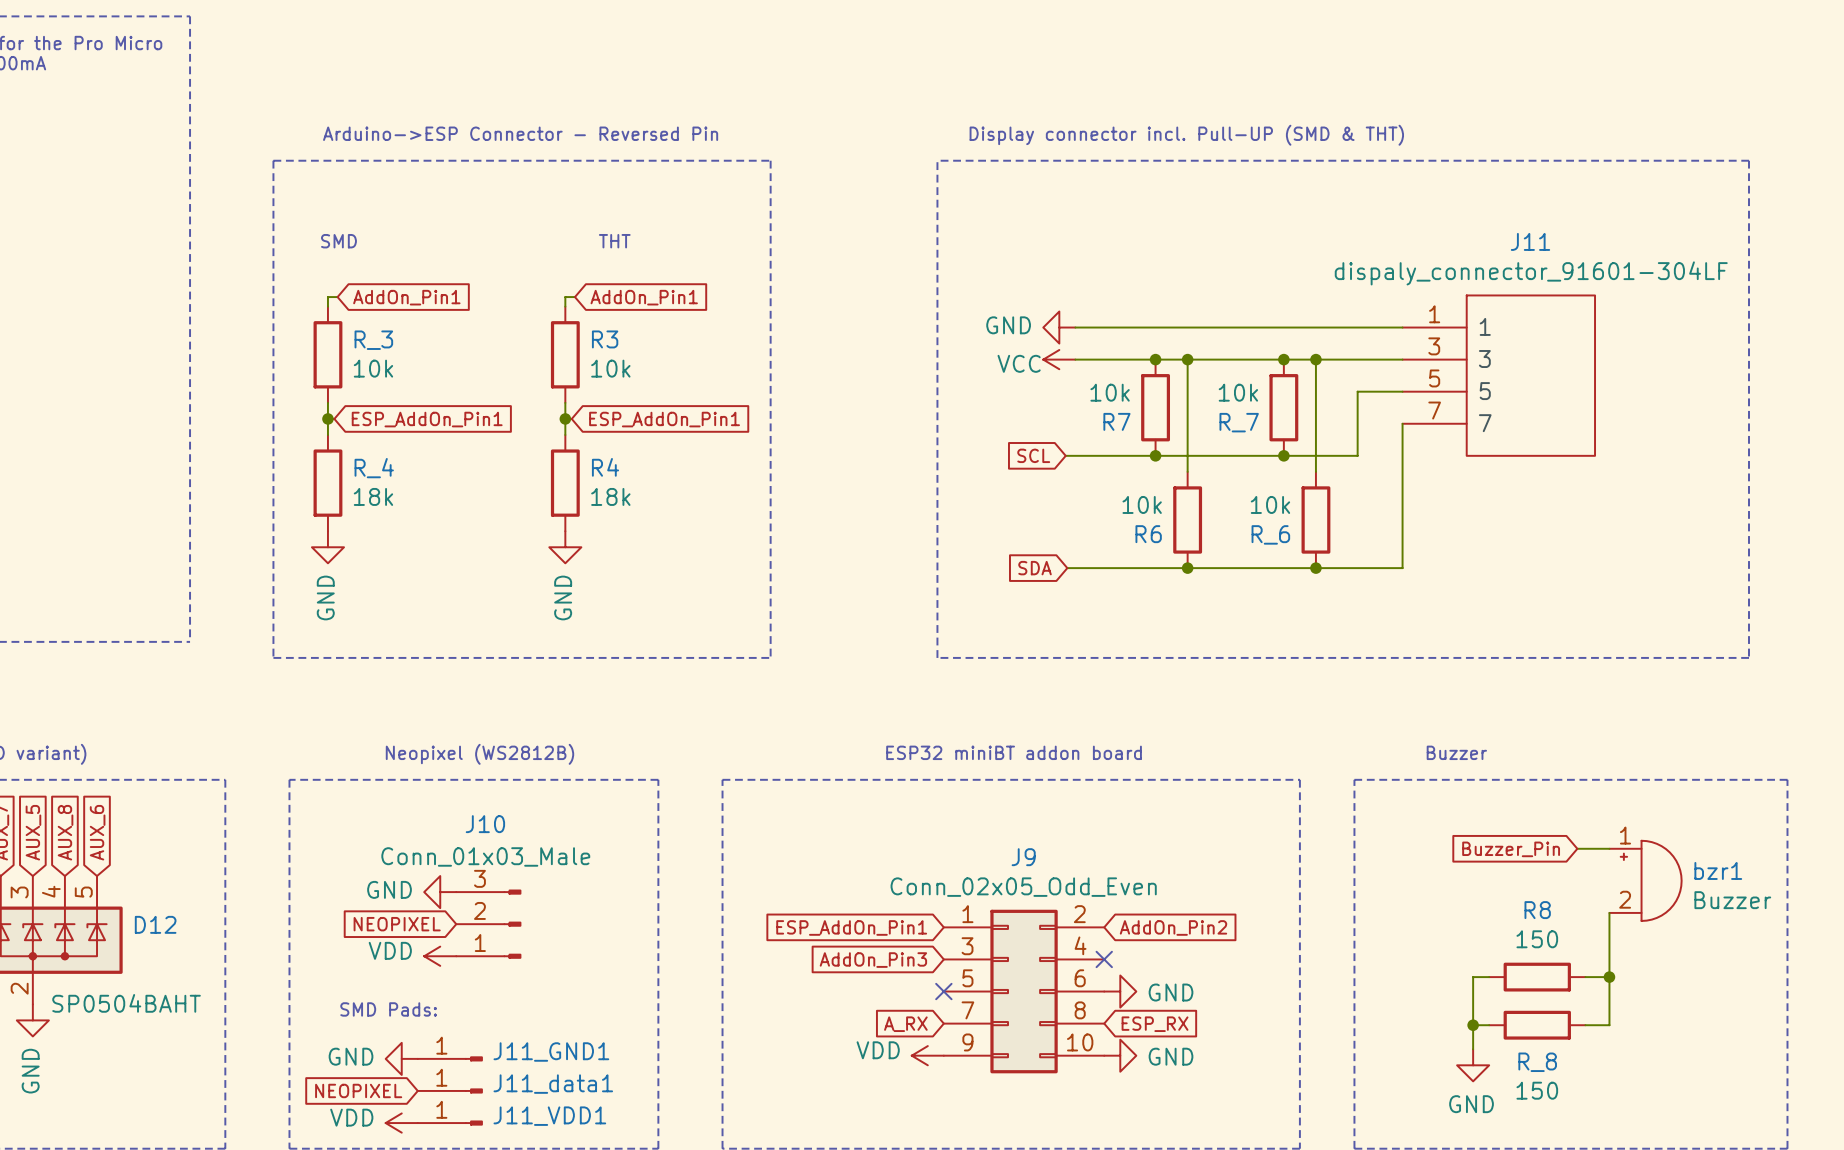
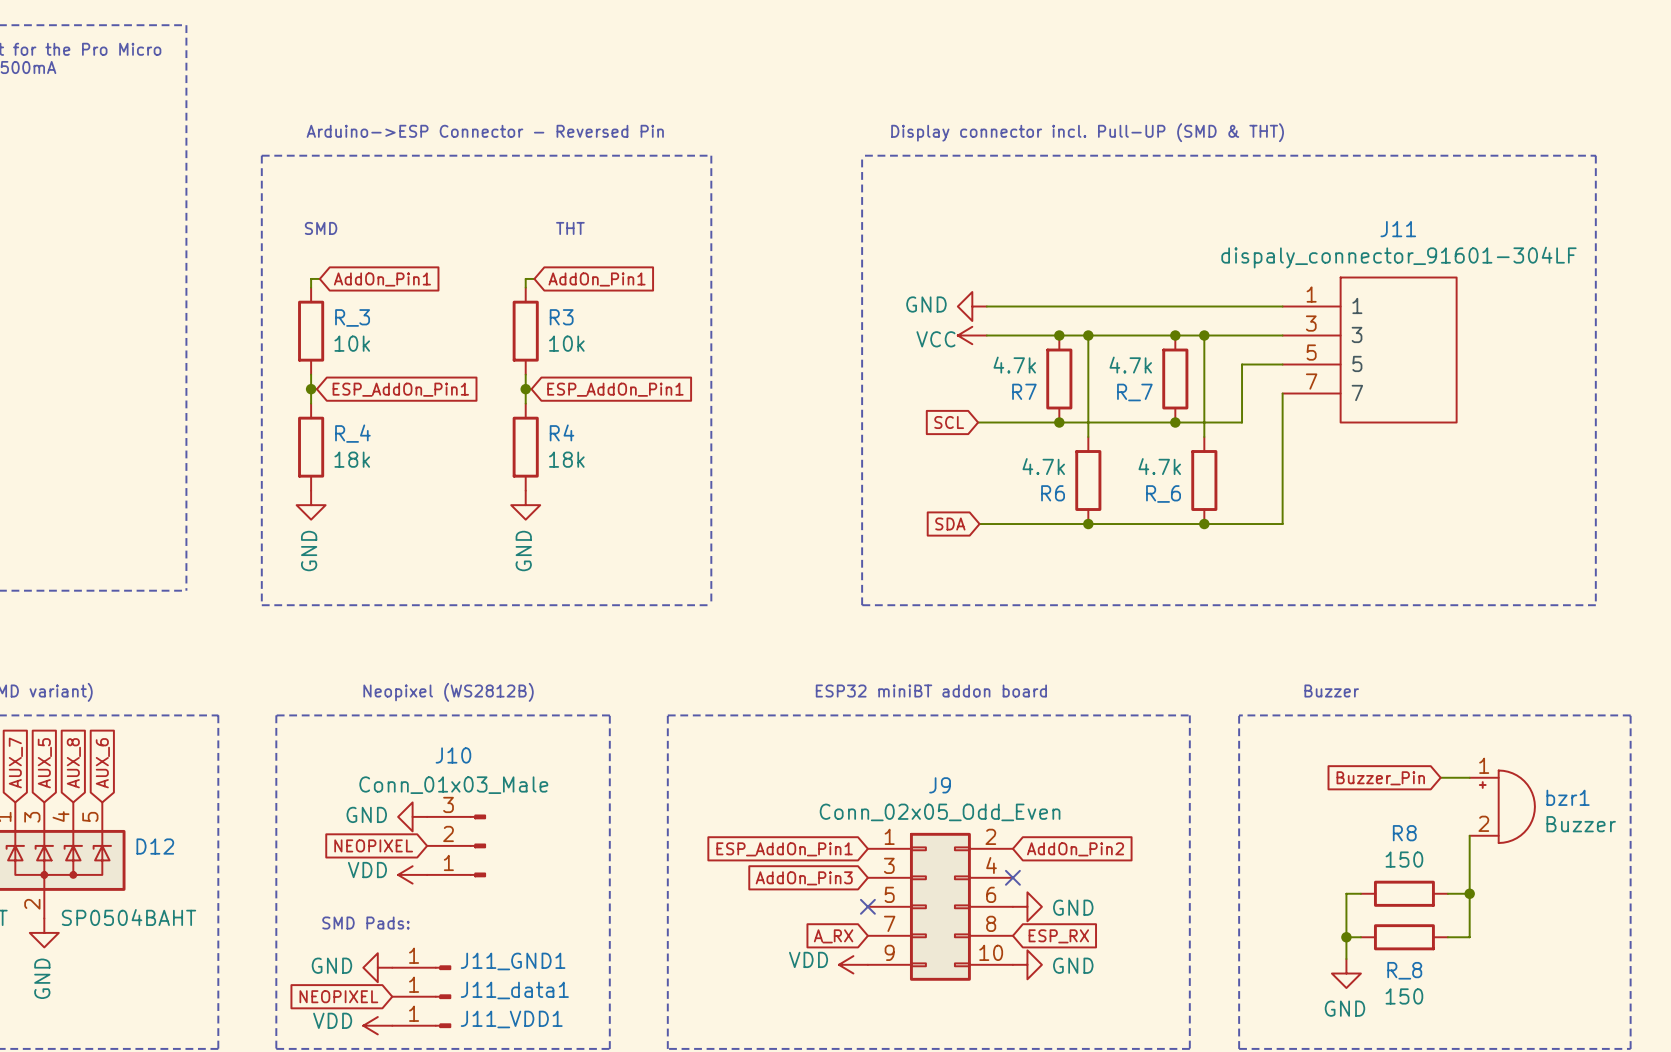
R7 value: 10k (1110, 392) -> 4.7k (1014, 365)
R_7 value: 10k (1238, 392) -> 4.7k (1130, 365)
R6 value: 10k (1142, 504) -> 4.7k (1043, 466)
R_6 value: 10k (1270, 504) -> 4.7k (1159, 466)

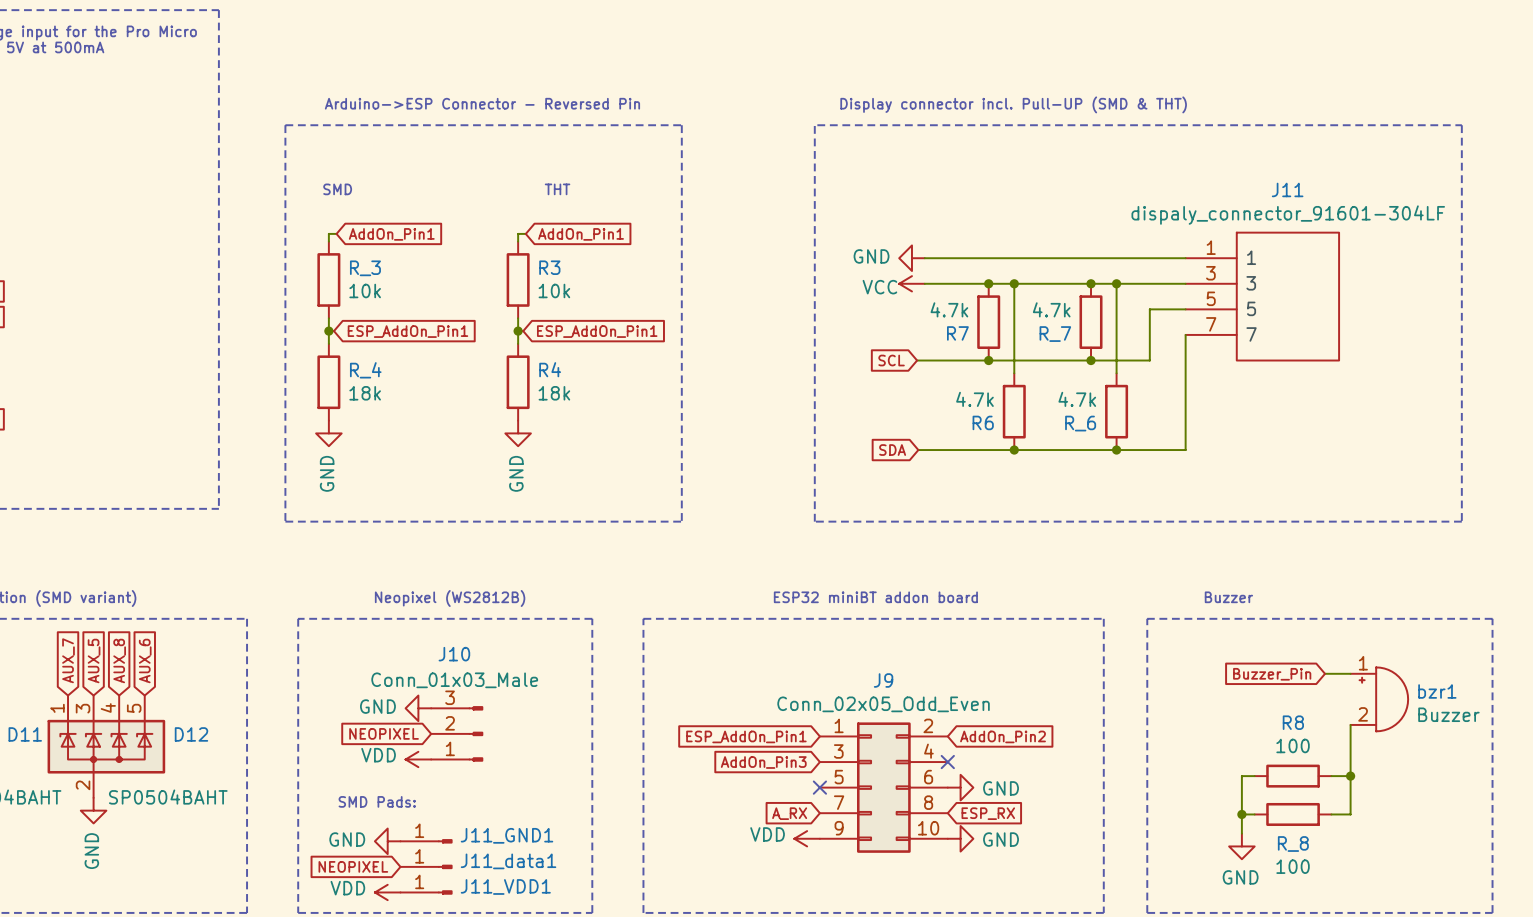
R8 value: 150 (1404, 859) -> 100 (1293, 745)
R_8 value: 150 (1404, 996) -> 100 (1293, 866)

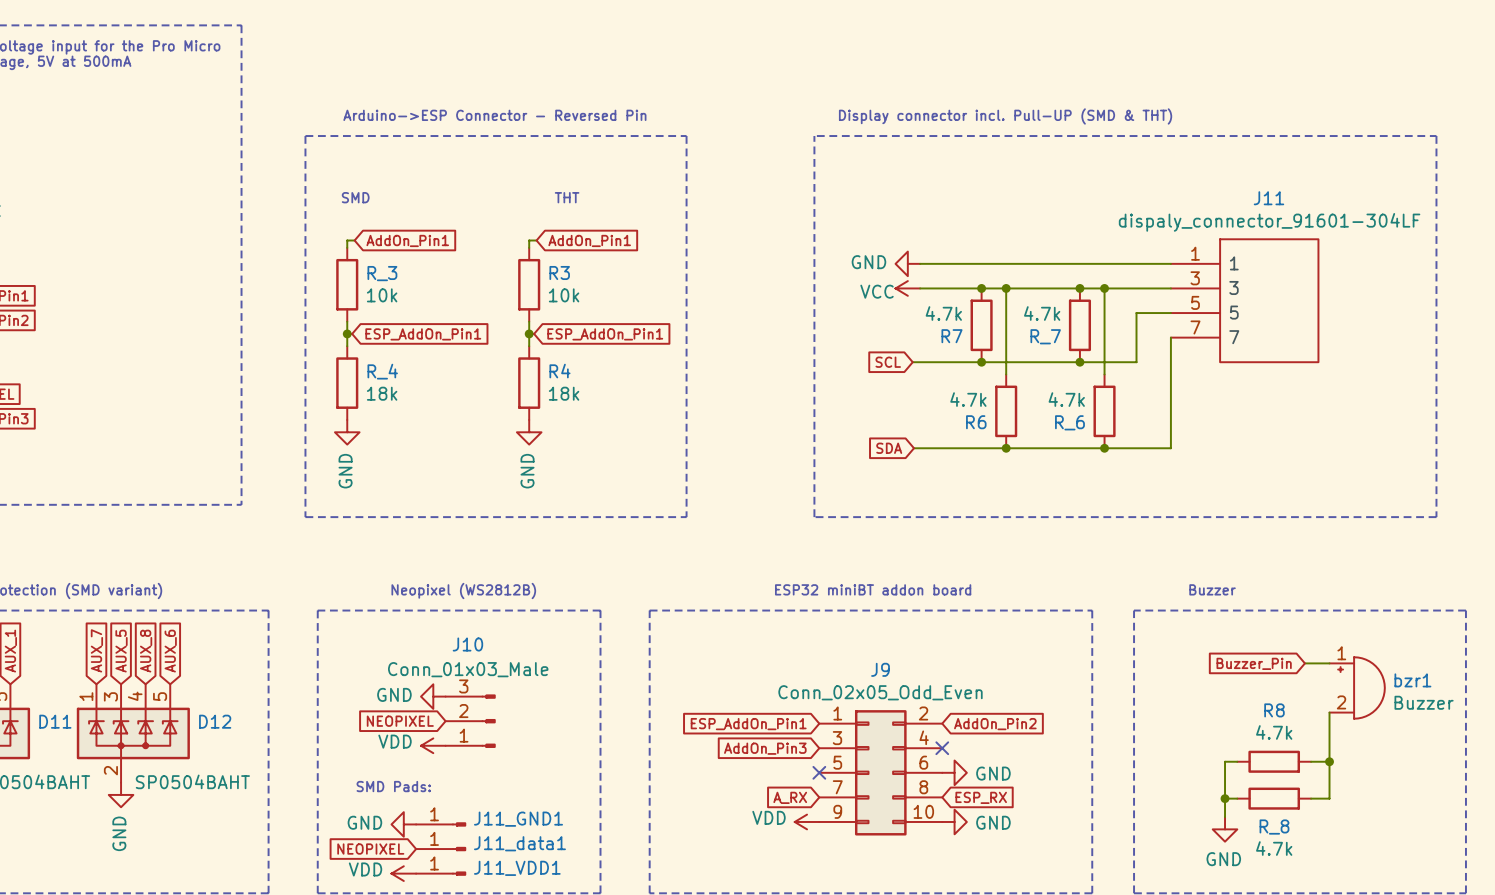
R8 value: 100 (1293, 745) -> 4.7k (1274, 732)
R_8 value: 100 (1293, 866) -> 4.7k (1274, 848)

